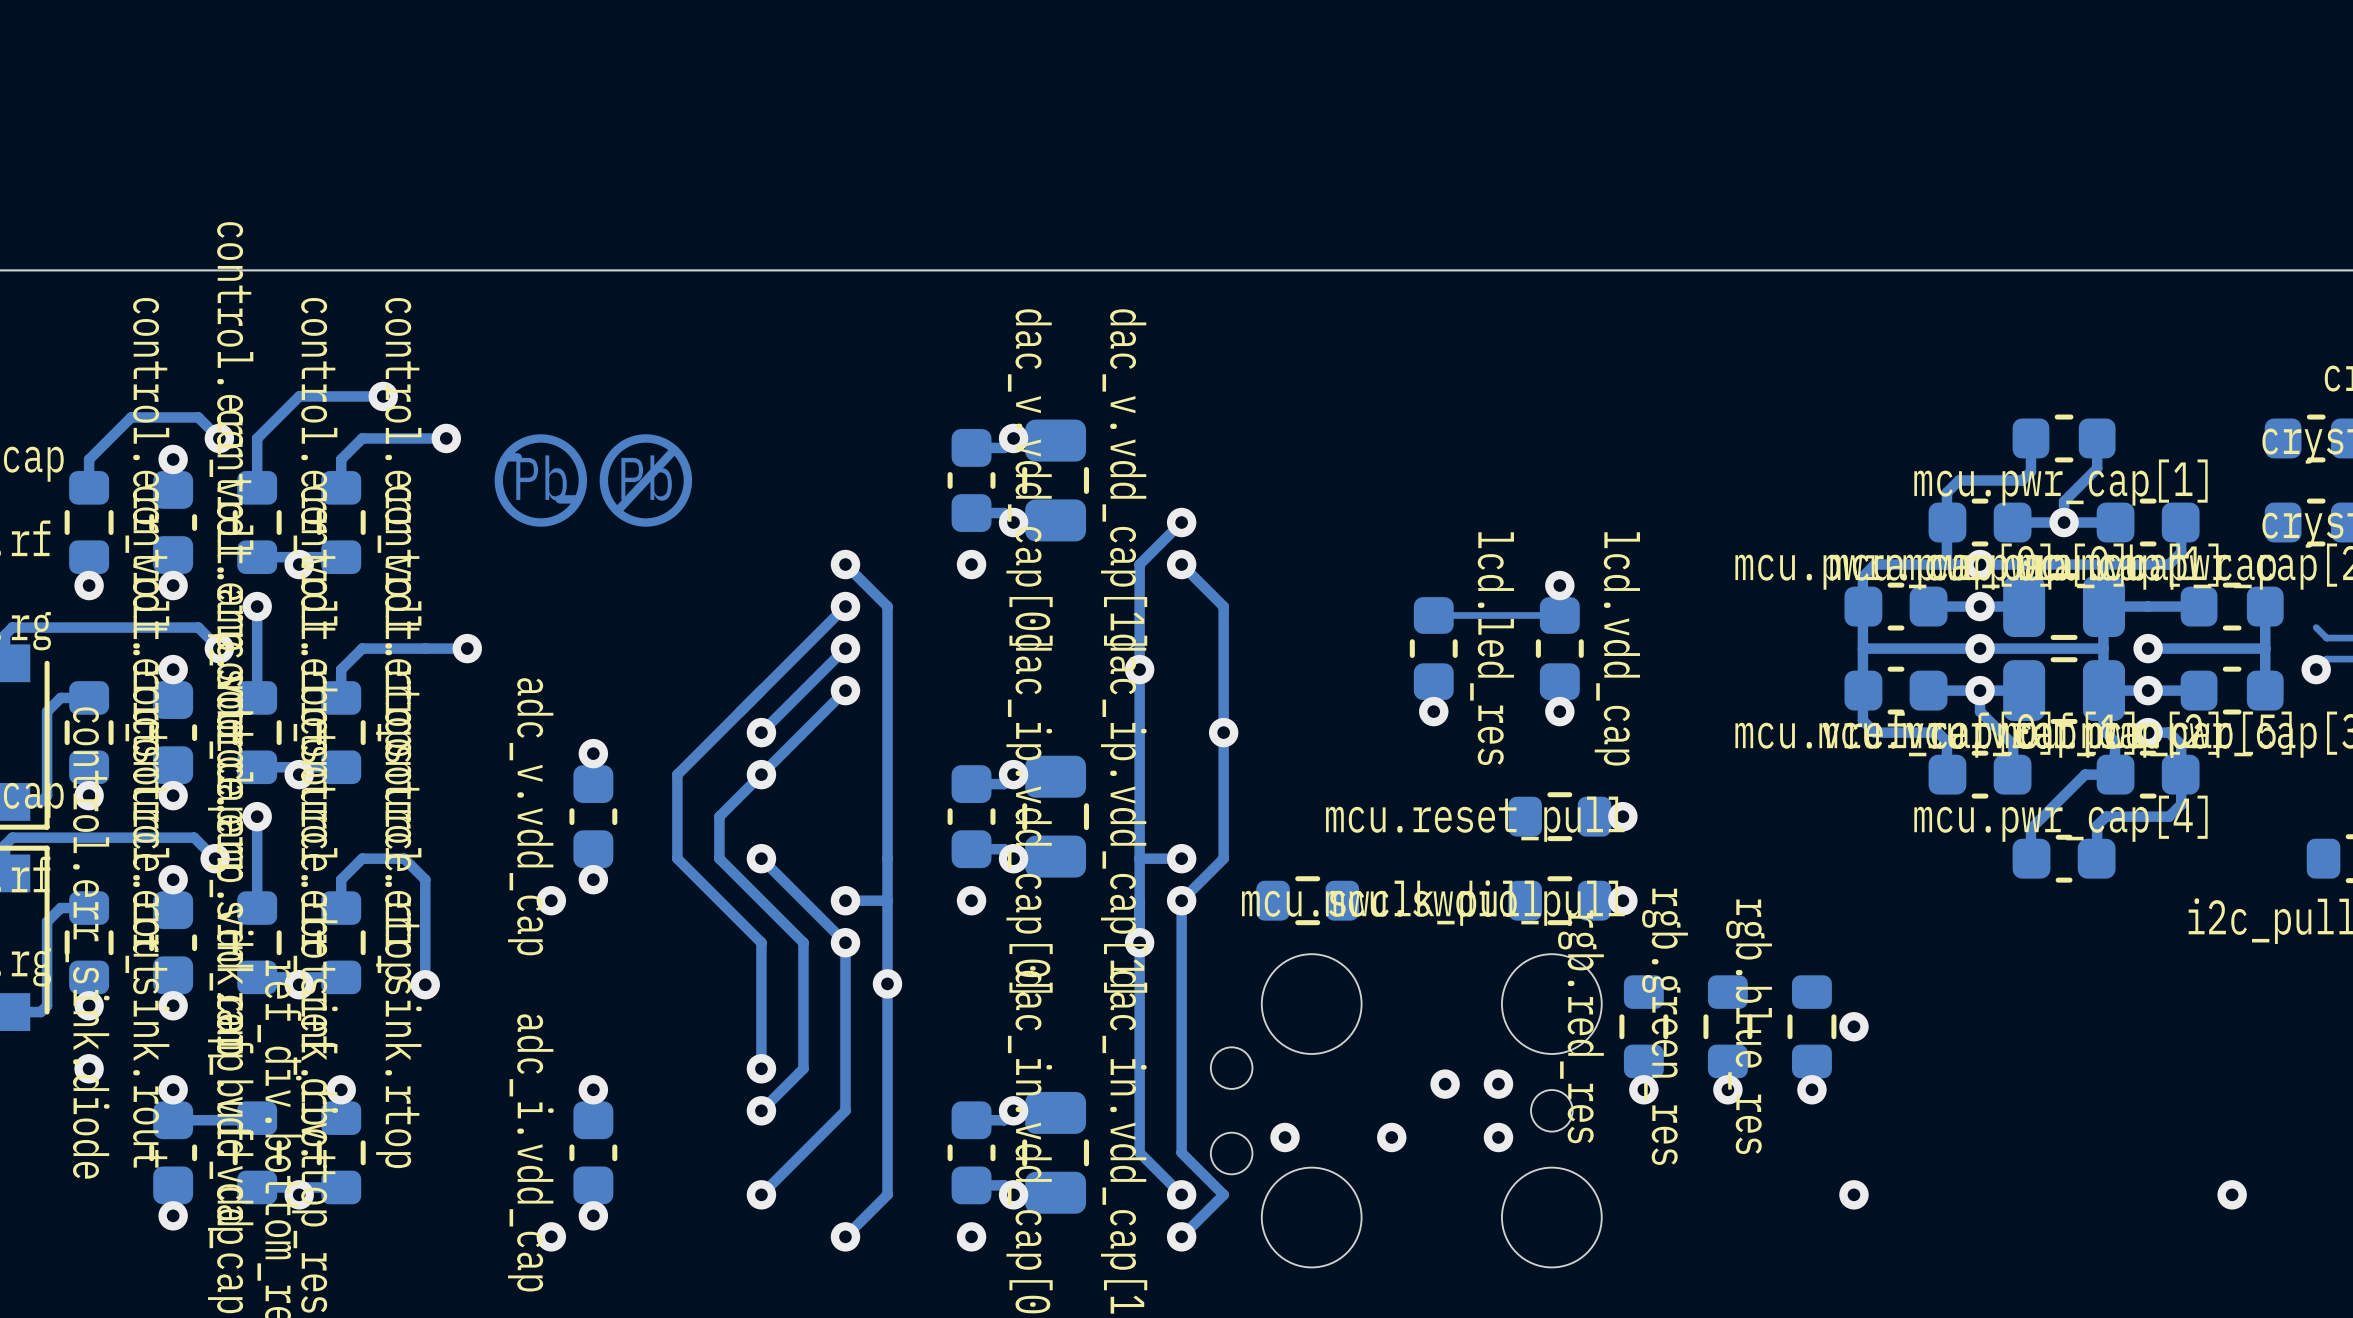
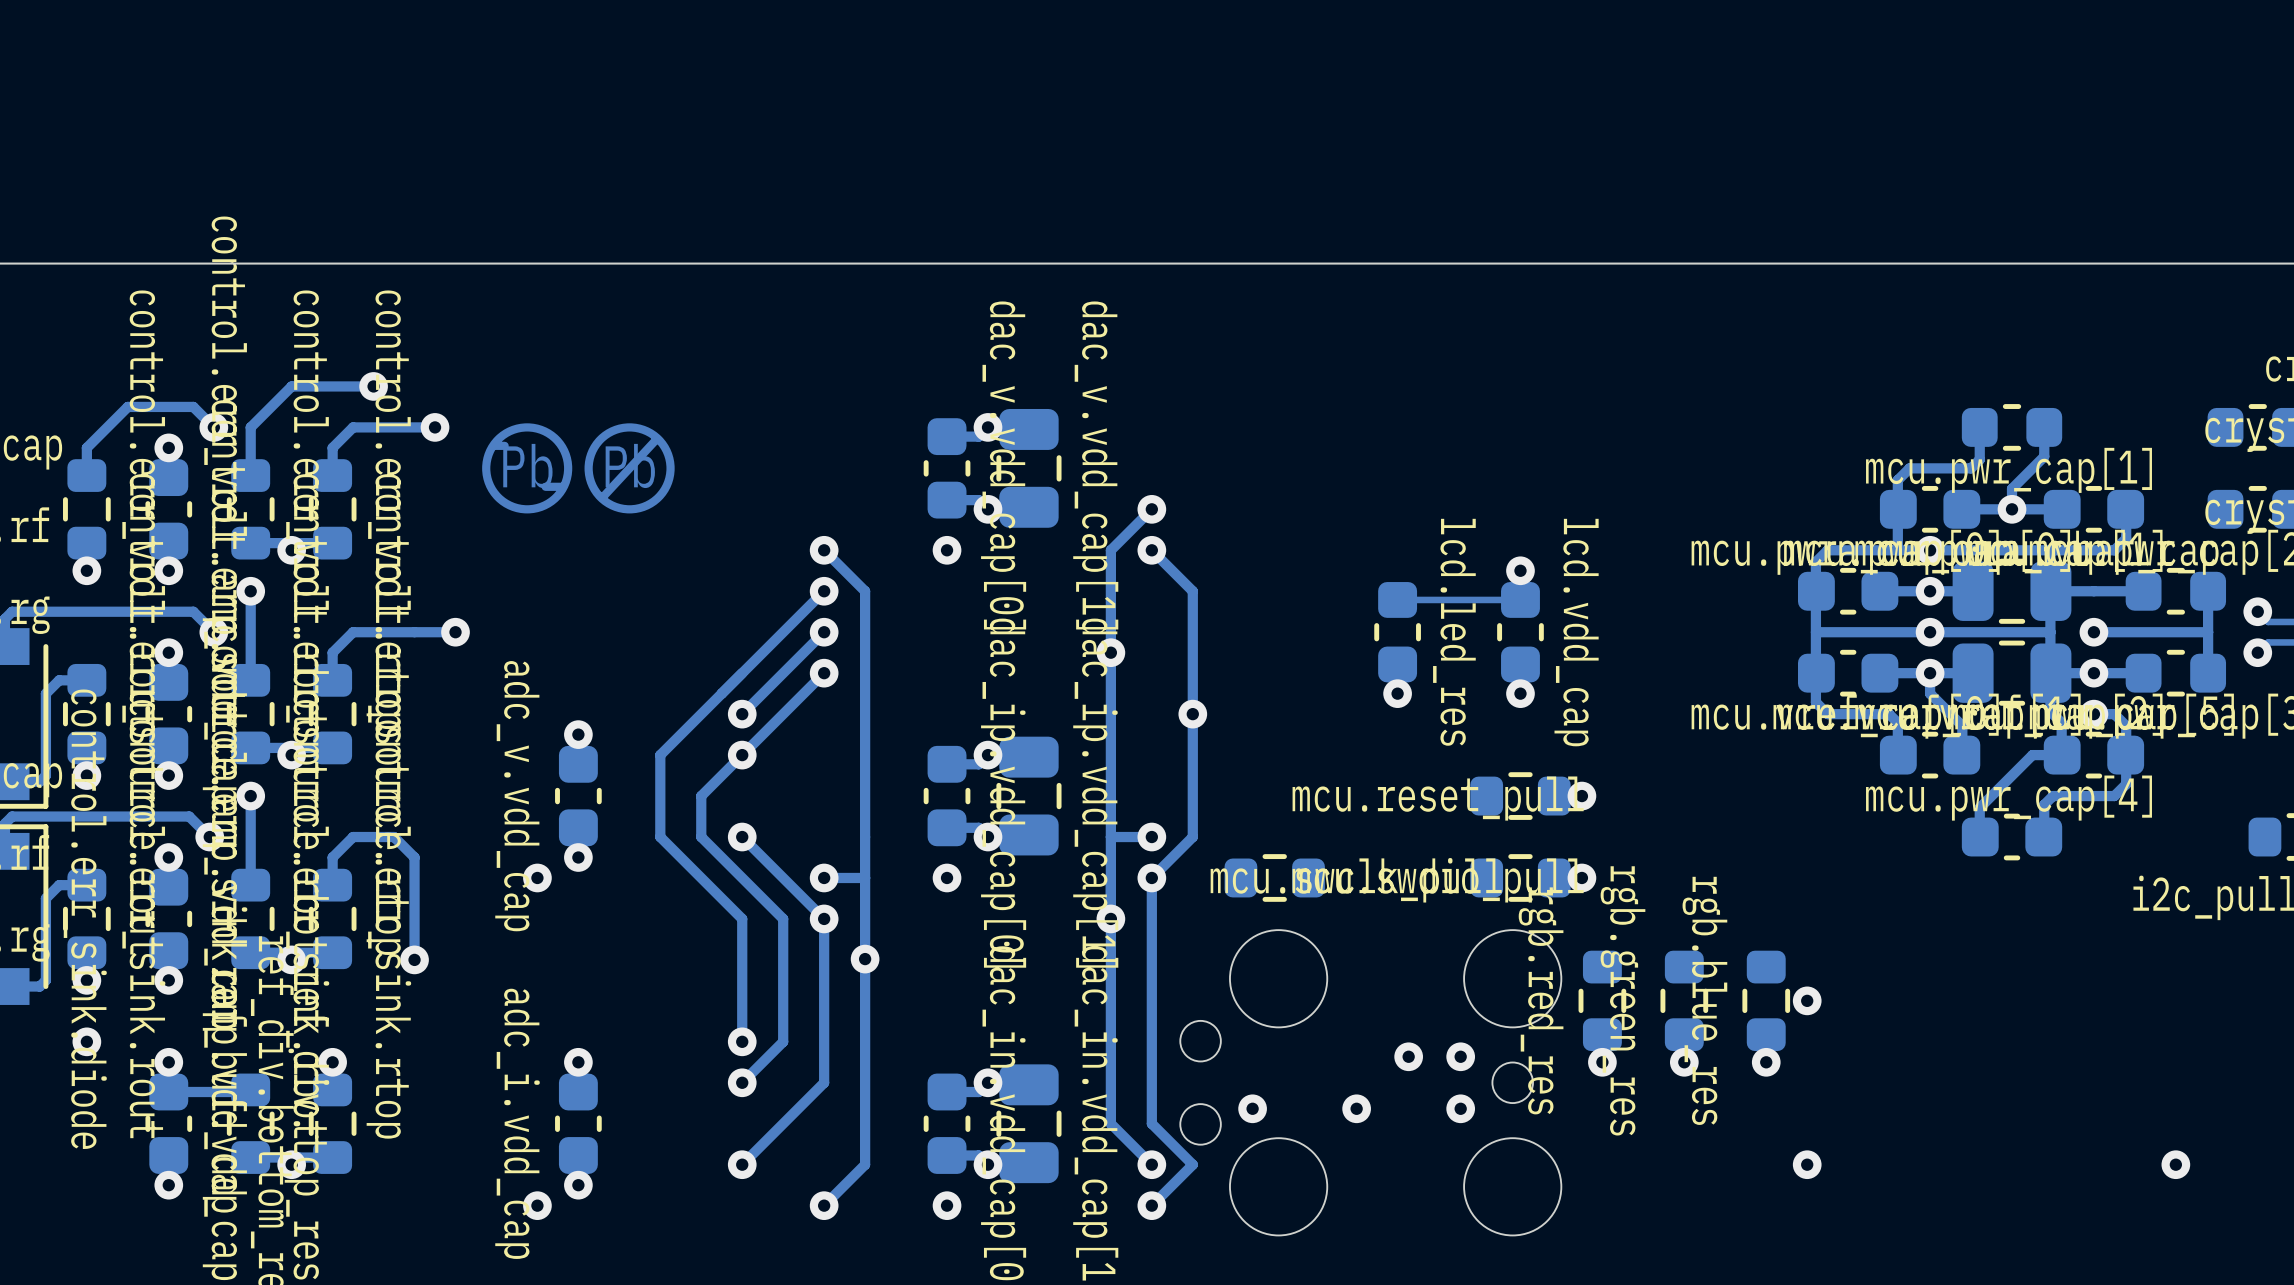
via: none -> (2257, 611)

